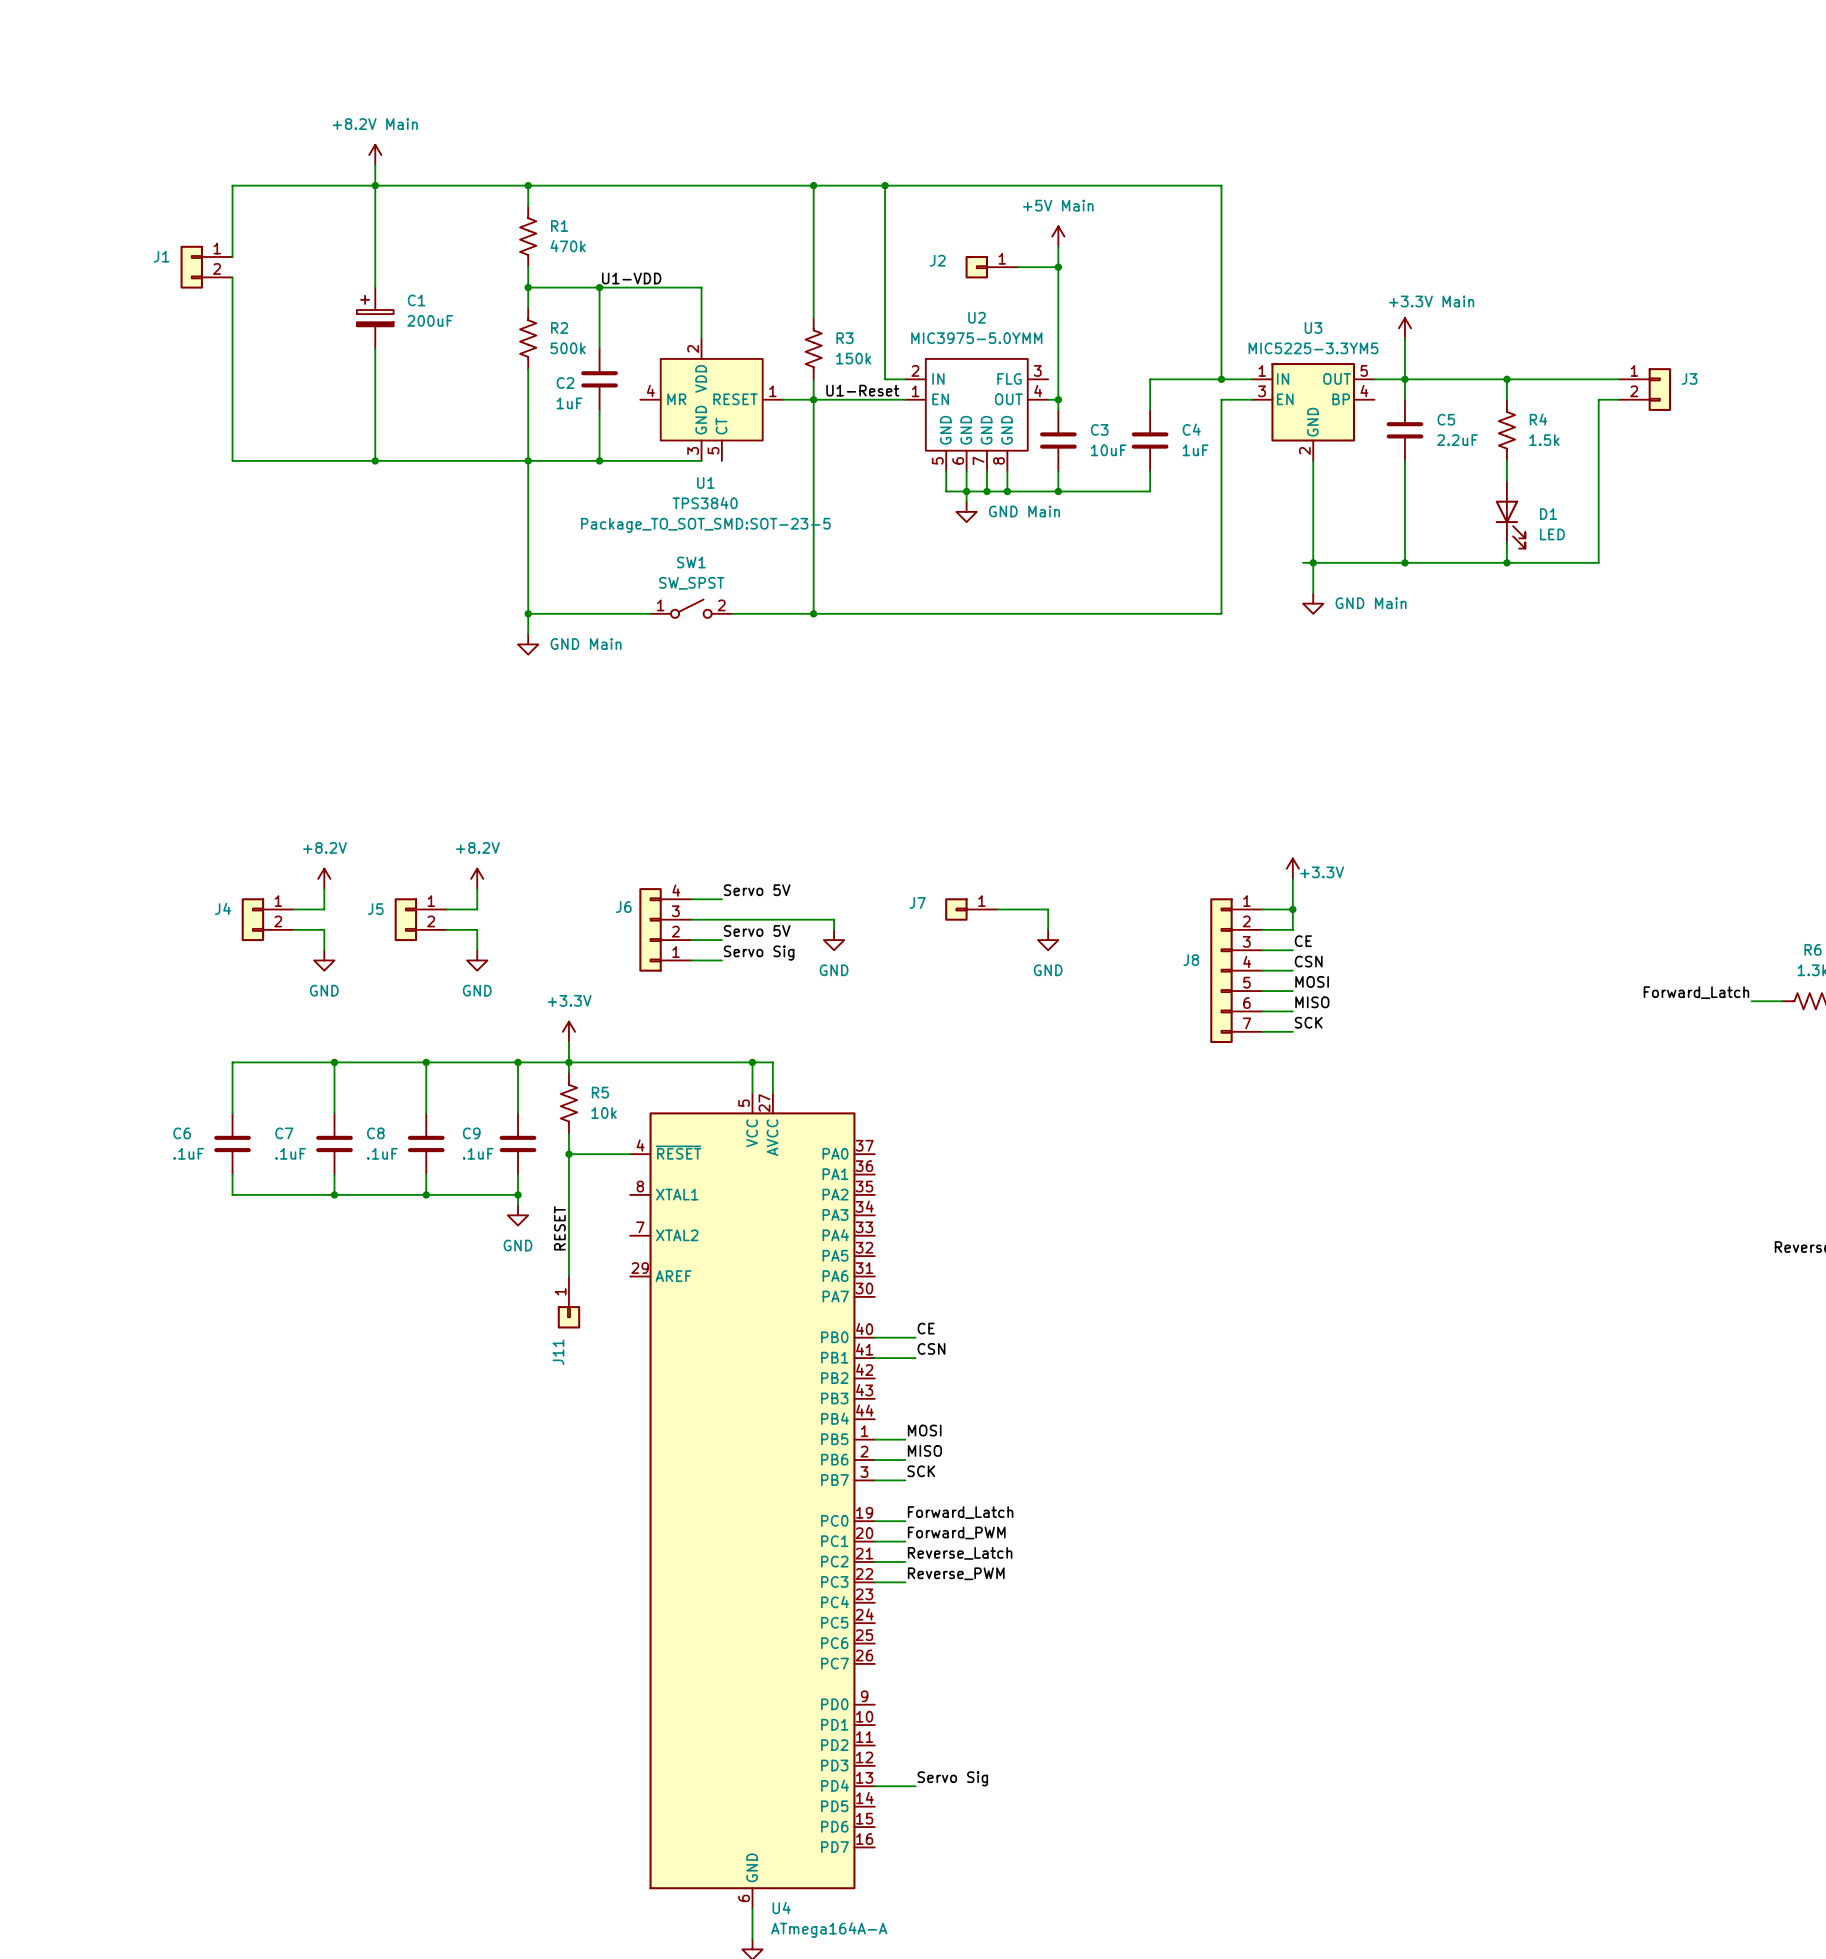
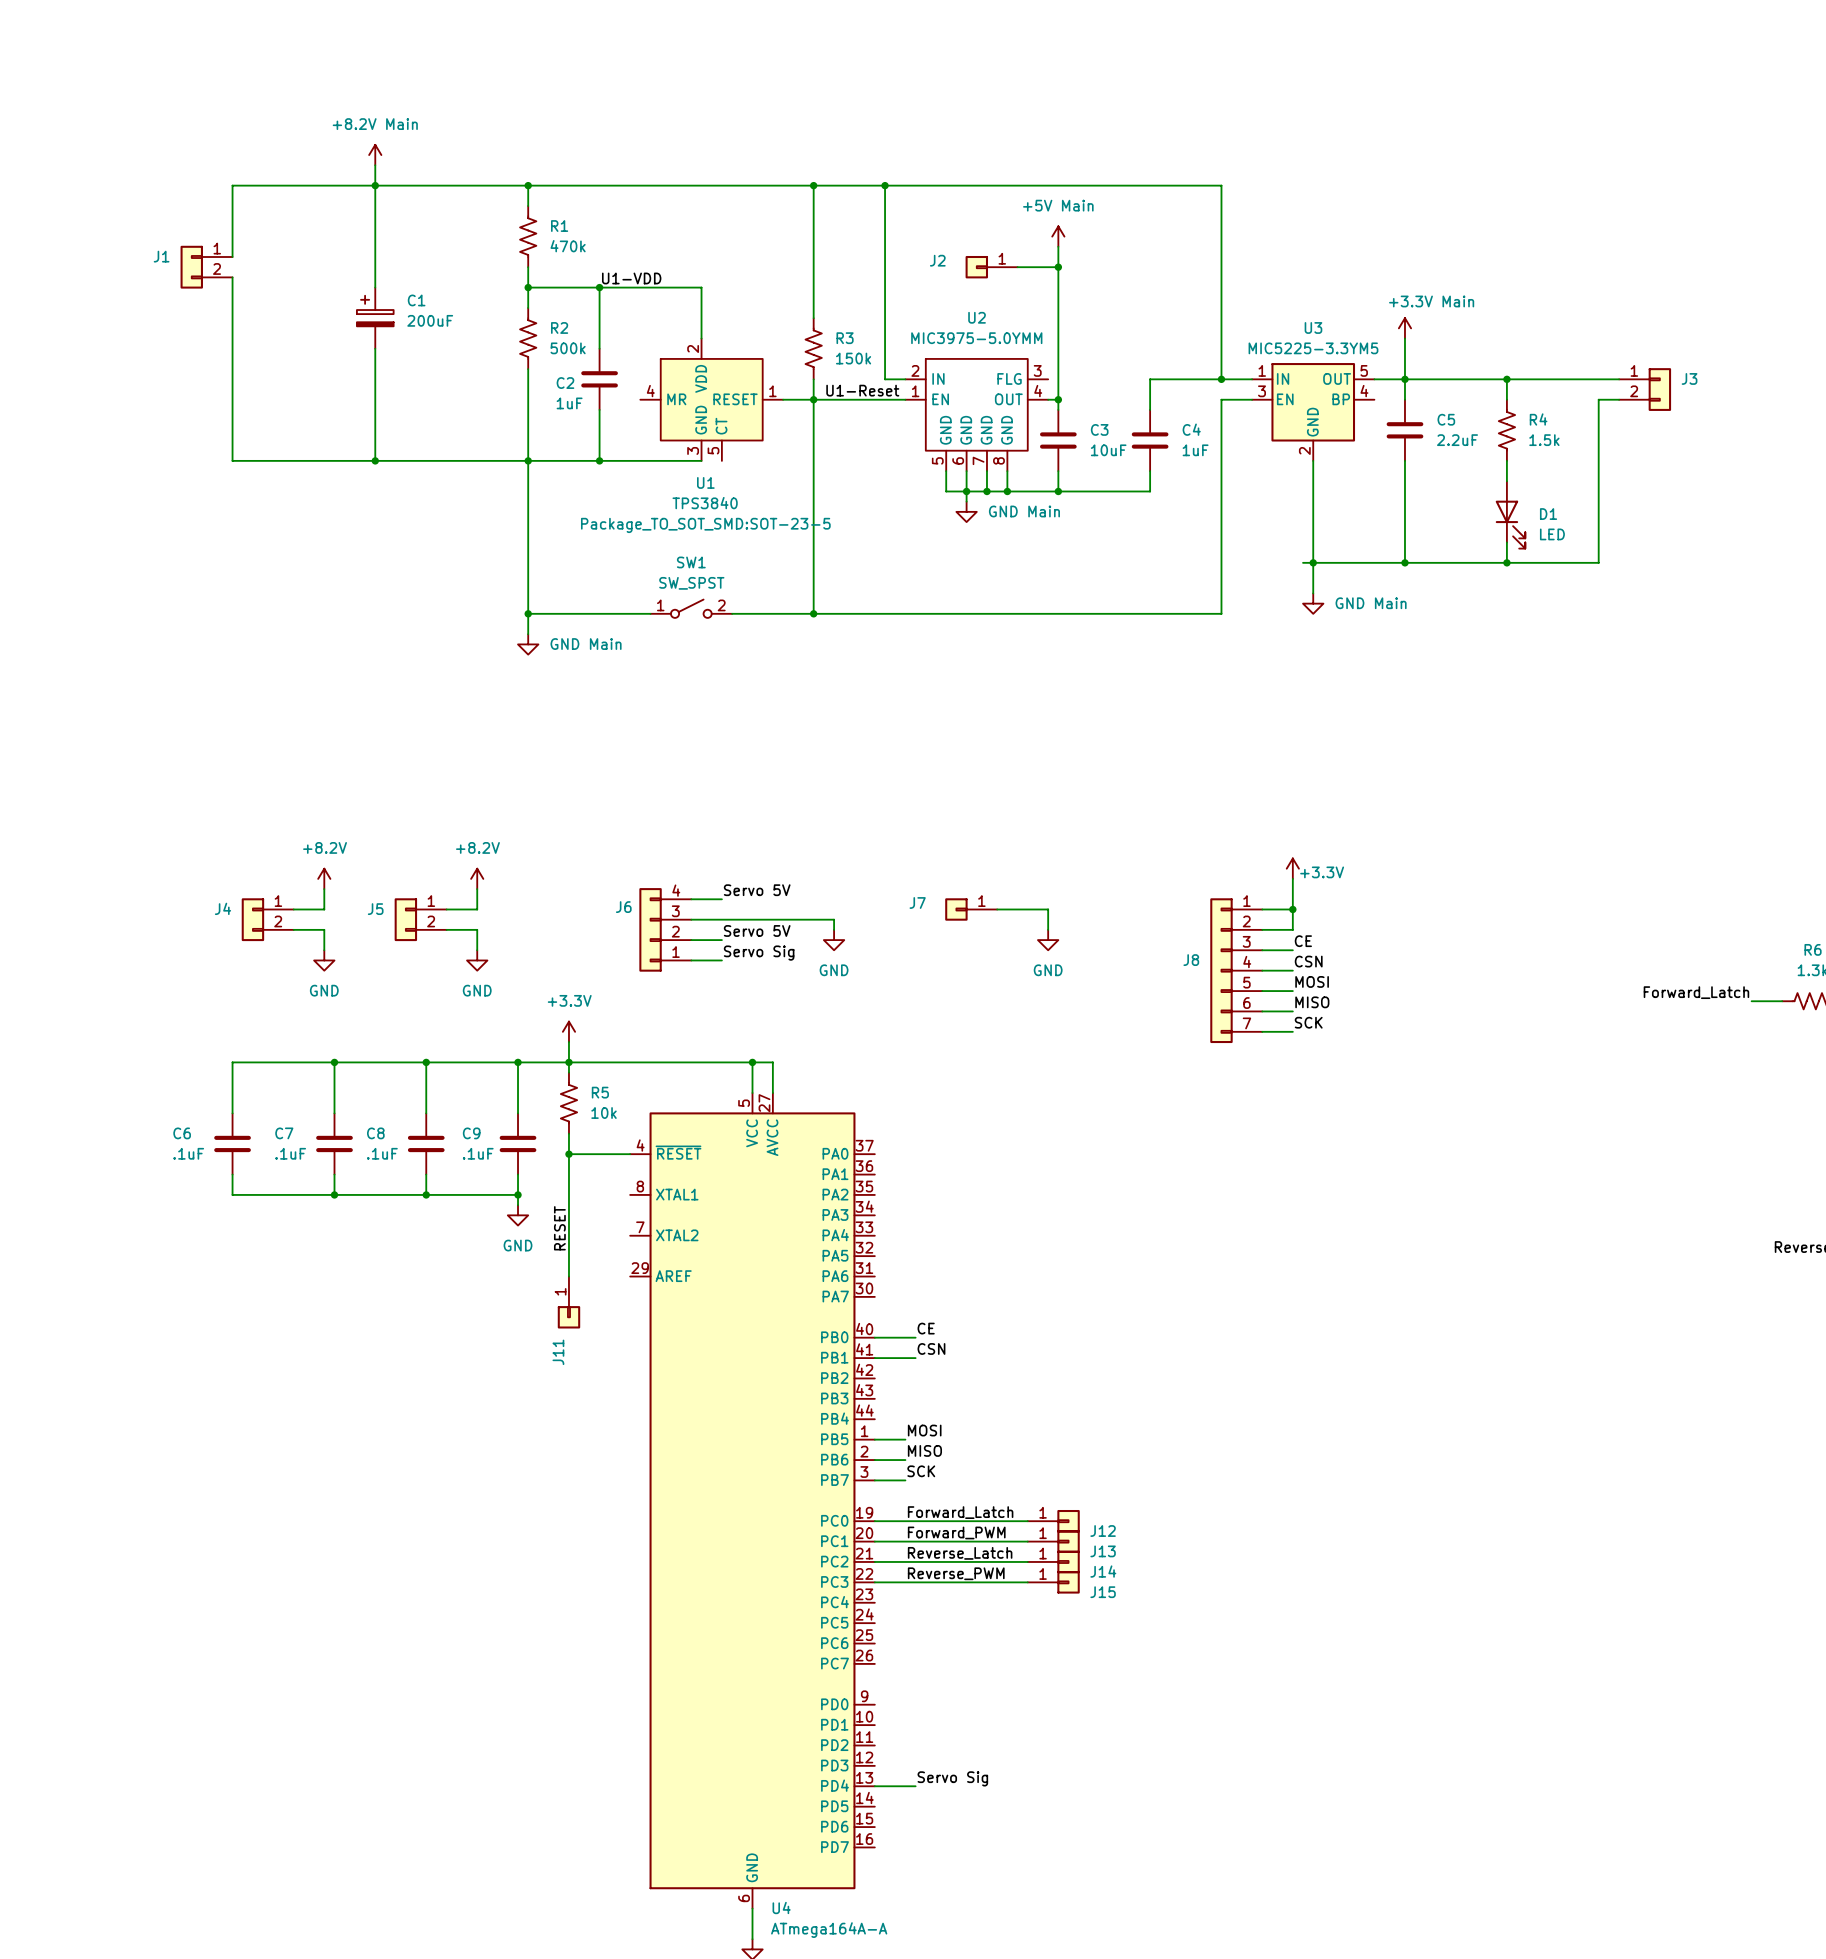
wire: none -> (905, 1521) (1027, 1521)
J12: none -> (1053, 1521)
wire: none -> (905, 1541) (1027, 1541)
J13: none -> (1053, 1541)
wire: none -> (905, 1561) (1027, 1561)
J14: none -> (1053, 1561)
wire: none -> (905, 1582) (1027, 1582)
J15: none -> (1053, 1582)

